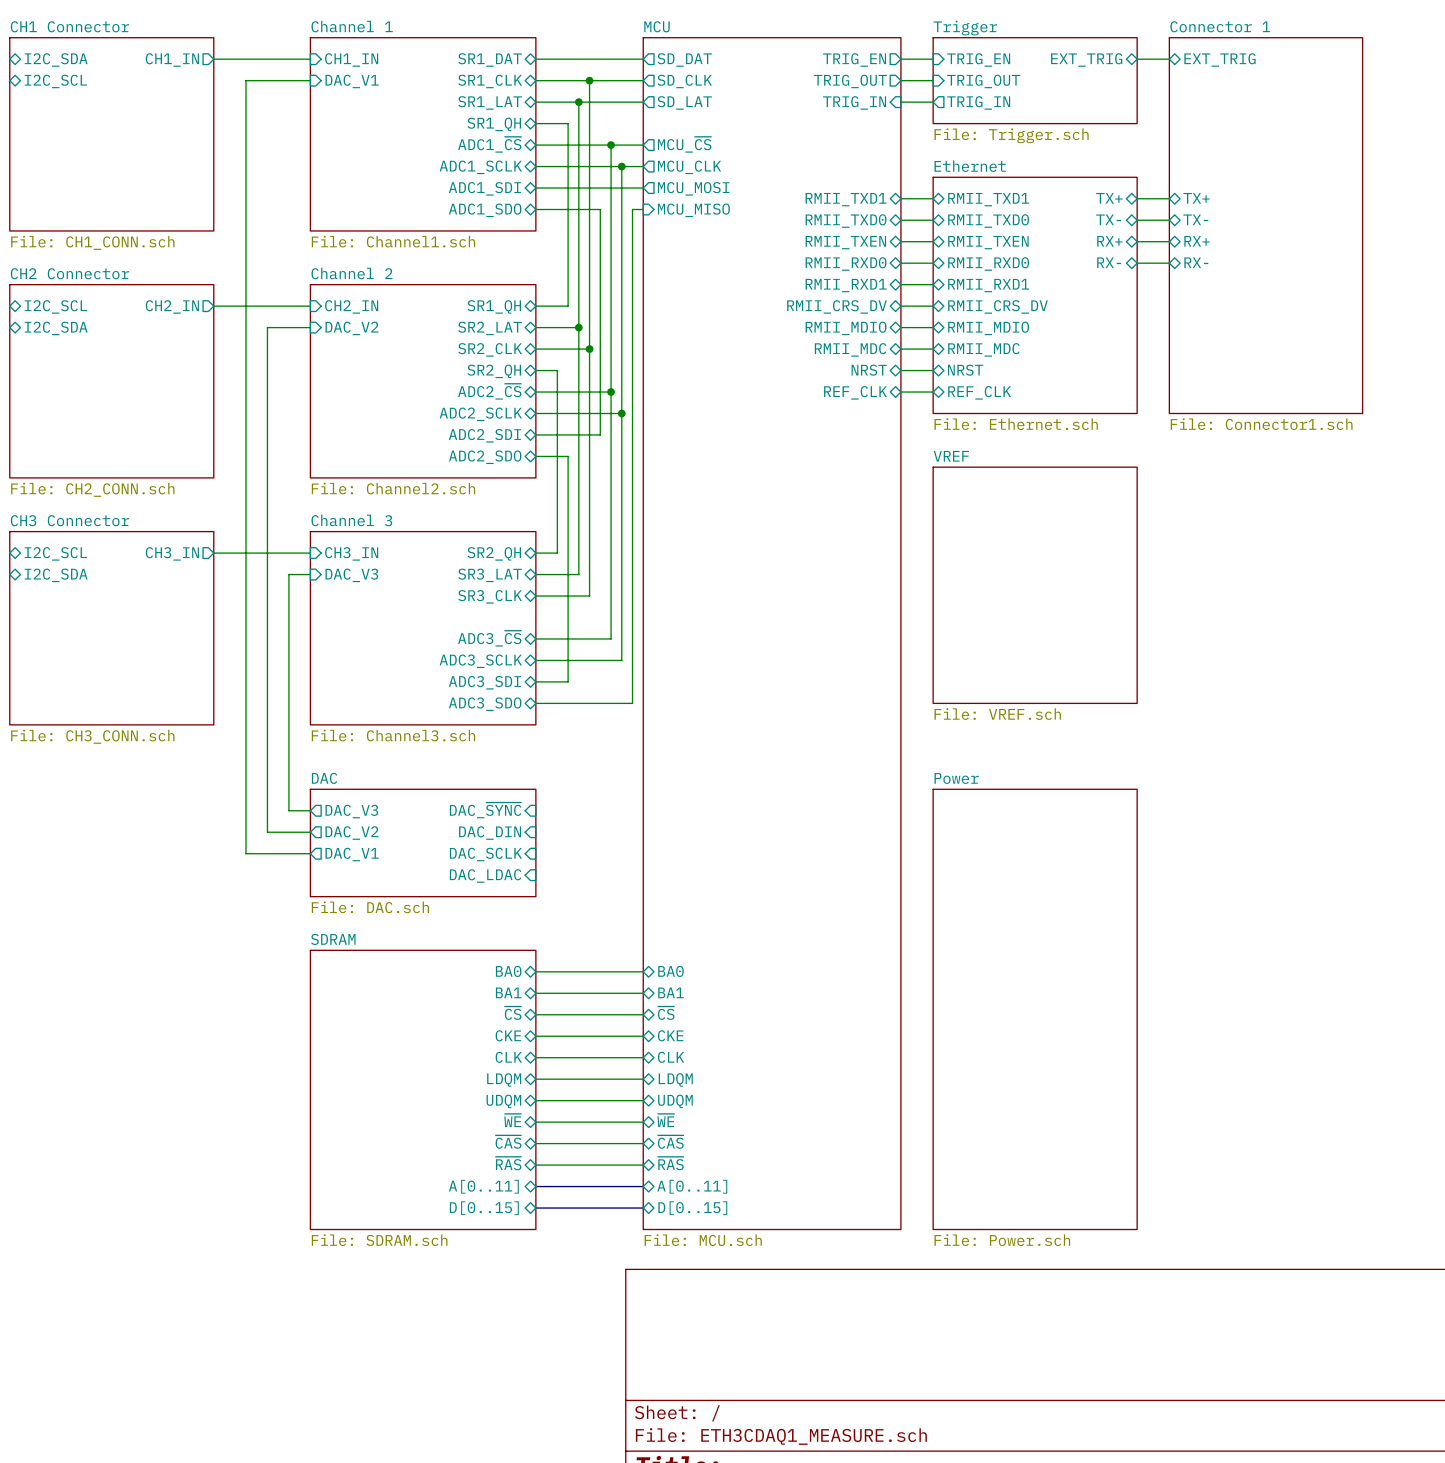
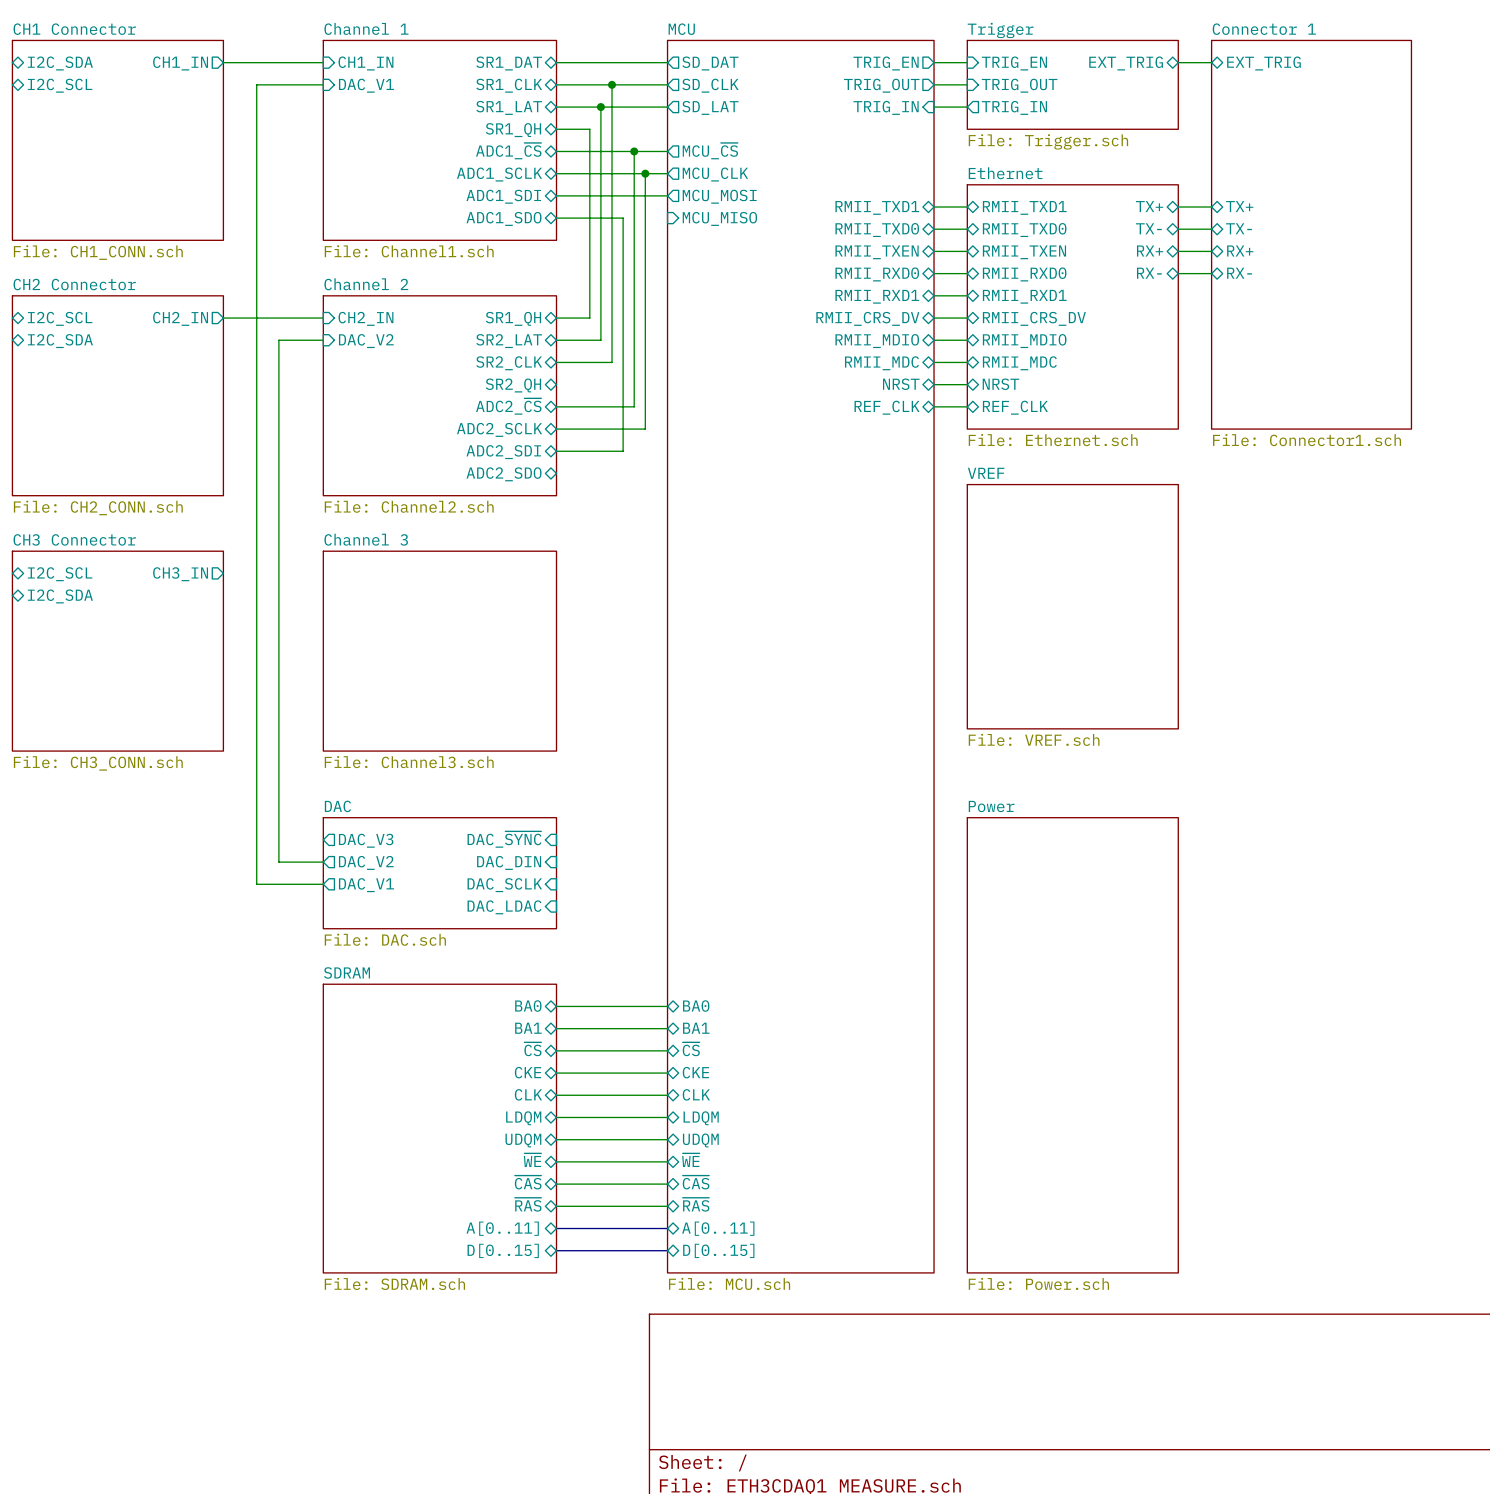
wire: (643, 209) (632, 209) (632, 703) (535, 703) -> none
wire: (578, 327) (578, 574) (535, 574) -> none
junction: (578, 327) -> none
wire: (589, 349) (589, 596) (535, 596) -> none
junction: (589, 349) -> none
wire: (535, 370) (557, 370) (557, 553) (535, 553) -> none
wire: (611, 392) (611, 638) (535, 638) -> none
junction: (611, 392) -> none
wire: (621, 413) (621, 660) (535, 660) -> none
junction: (621, 413) -> none
wire: (535, 456) (568, 456) (568, 681) (535, 681) -> none
wire: (213, 553) (310, 553) -> none
sheet pin: CH3_IN (351, 553) -> none
sheet pin: SR2_QH (494, 553) -> none
wire: (310, 574) (288, 574) (288, 810) (310, 810) -> none
sheet pin: DAC_V3 (351, 575) -> none
sheet pin: SR3_LAT (490, 575) -> none
sheet pin: SR3_CLK (490, 596) -> none
sheet pin: ADC3_~{CS} (489, 638) -> none
sheet pin: ADC3_SCLK (480, 661) -> none
sheet pin: ADC3_SDI (484, 682) -> none
sheet pin: ADC3_SDO (485, 704) -> none

